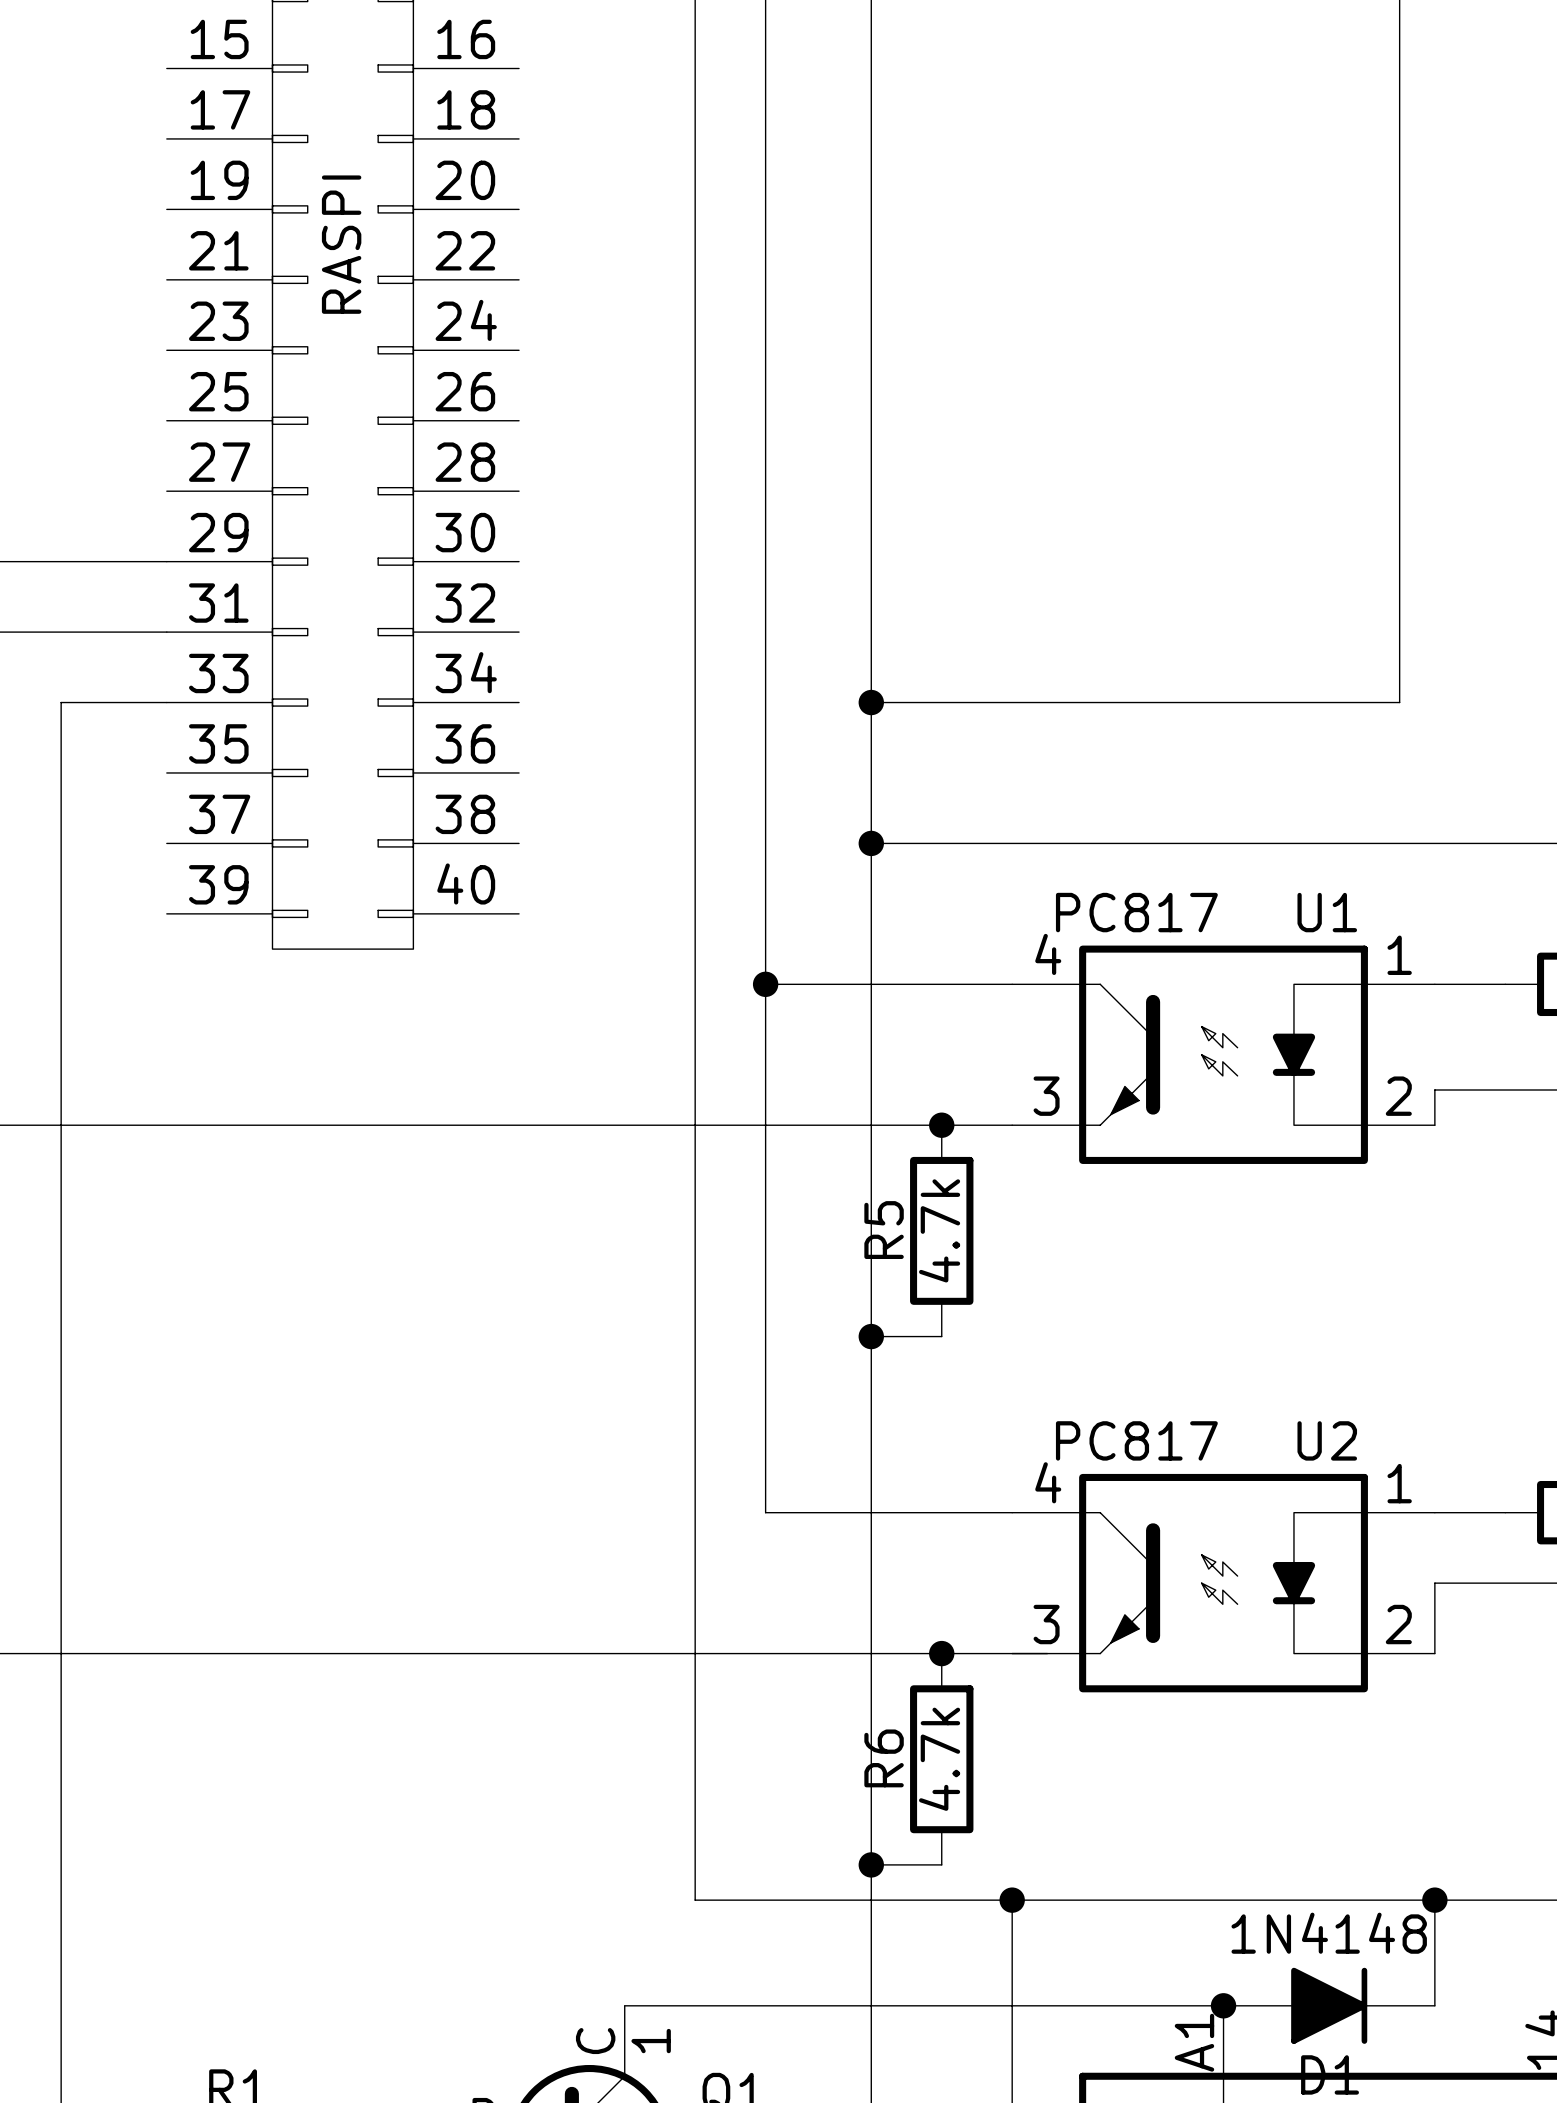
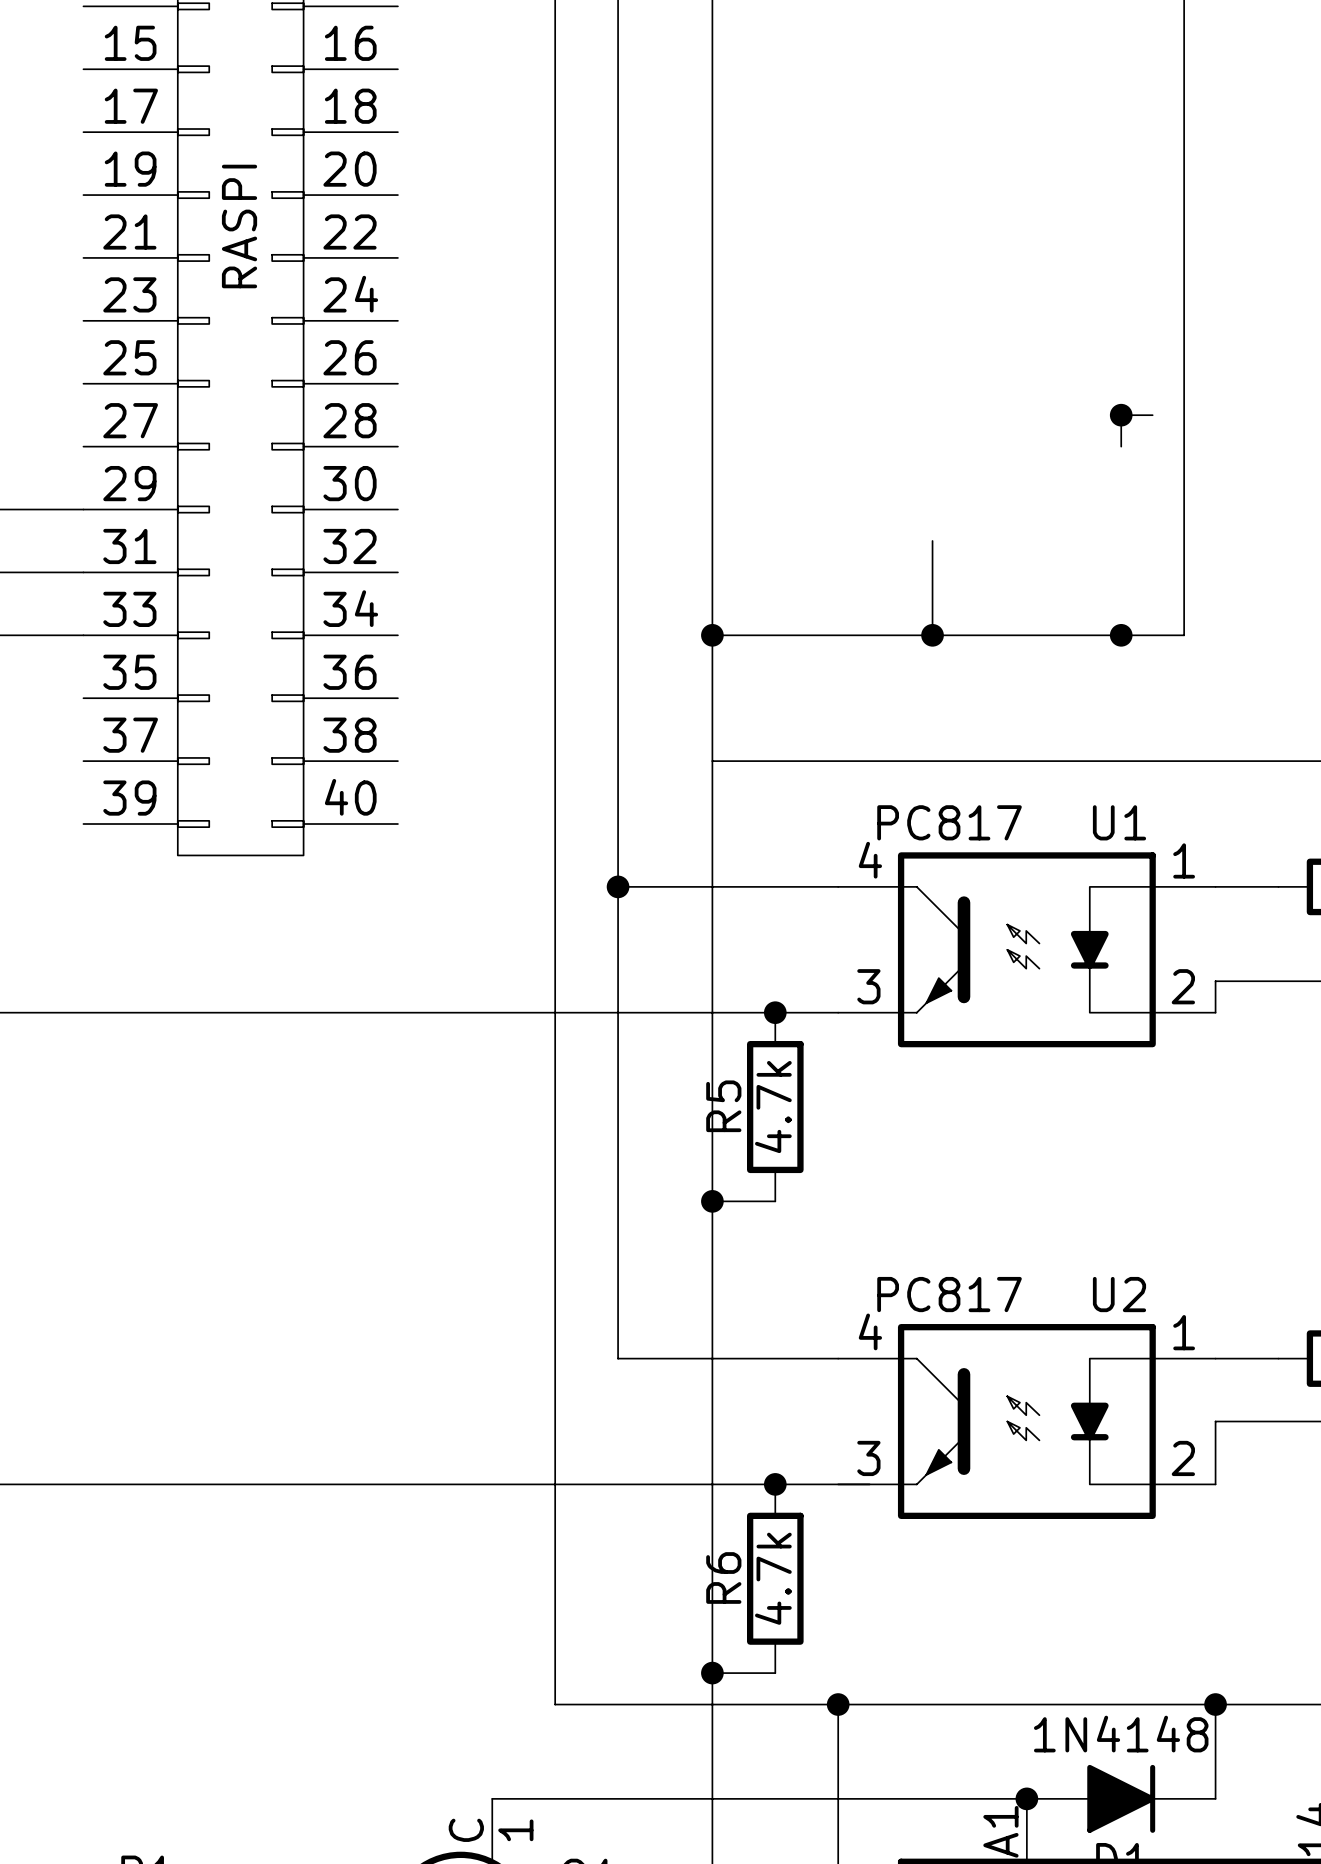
junction: none -> (1121, 415)
wire: none -> (1152, 415) (1121, 415) (1121, 446)
wire: none -> (932, 540) (932, 635)
junction: none -> (932, 635)
junction: none -> (1121, 635)
junction: (871, 843) -> none

